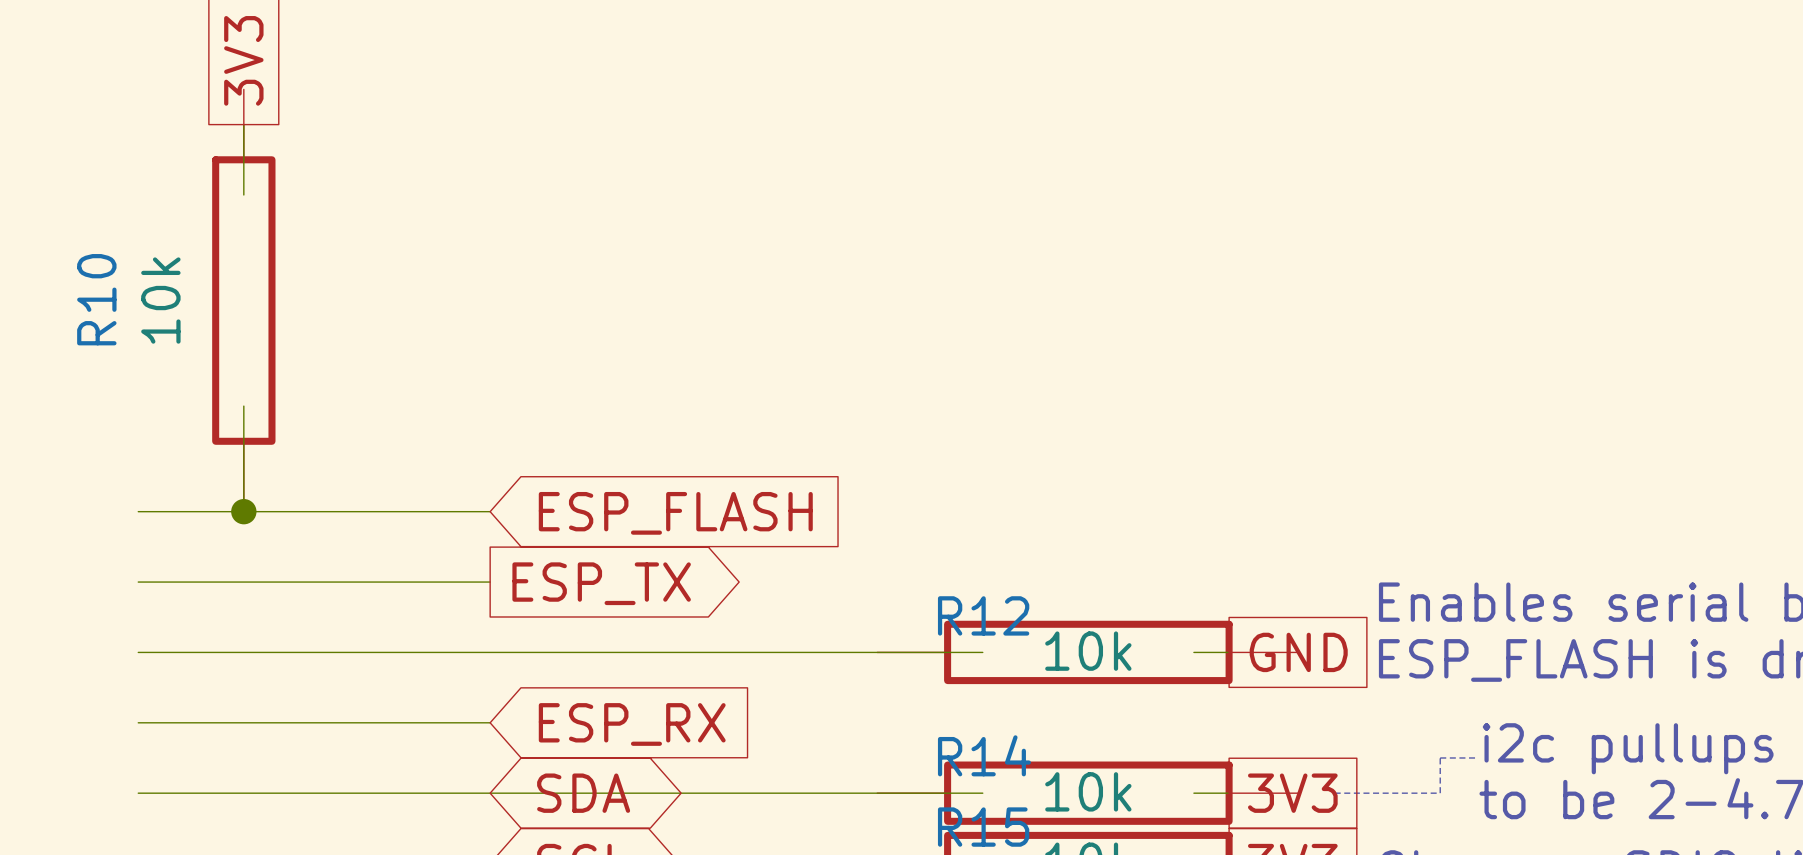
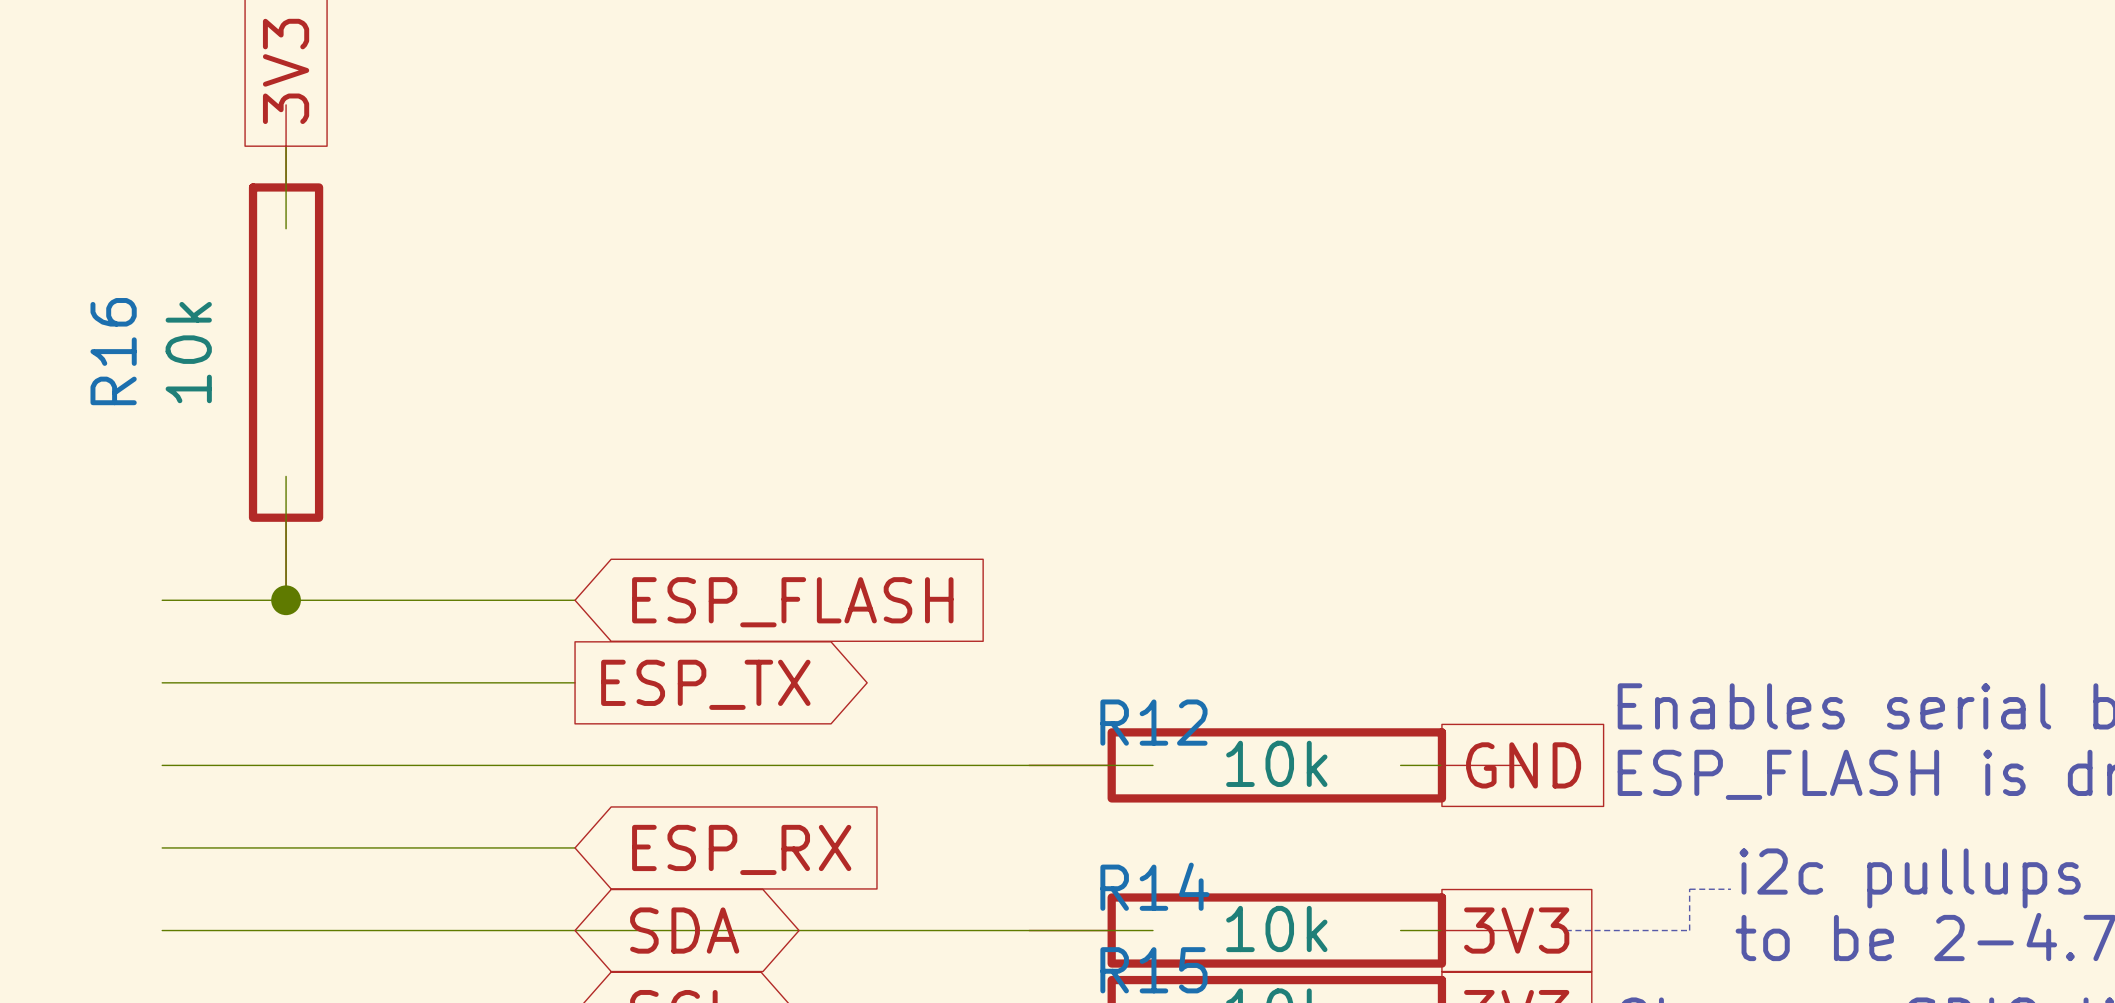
R10 name: R10 (96, 299) -> R16 (113, 351)

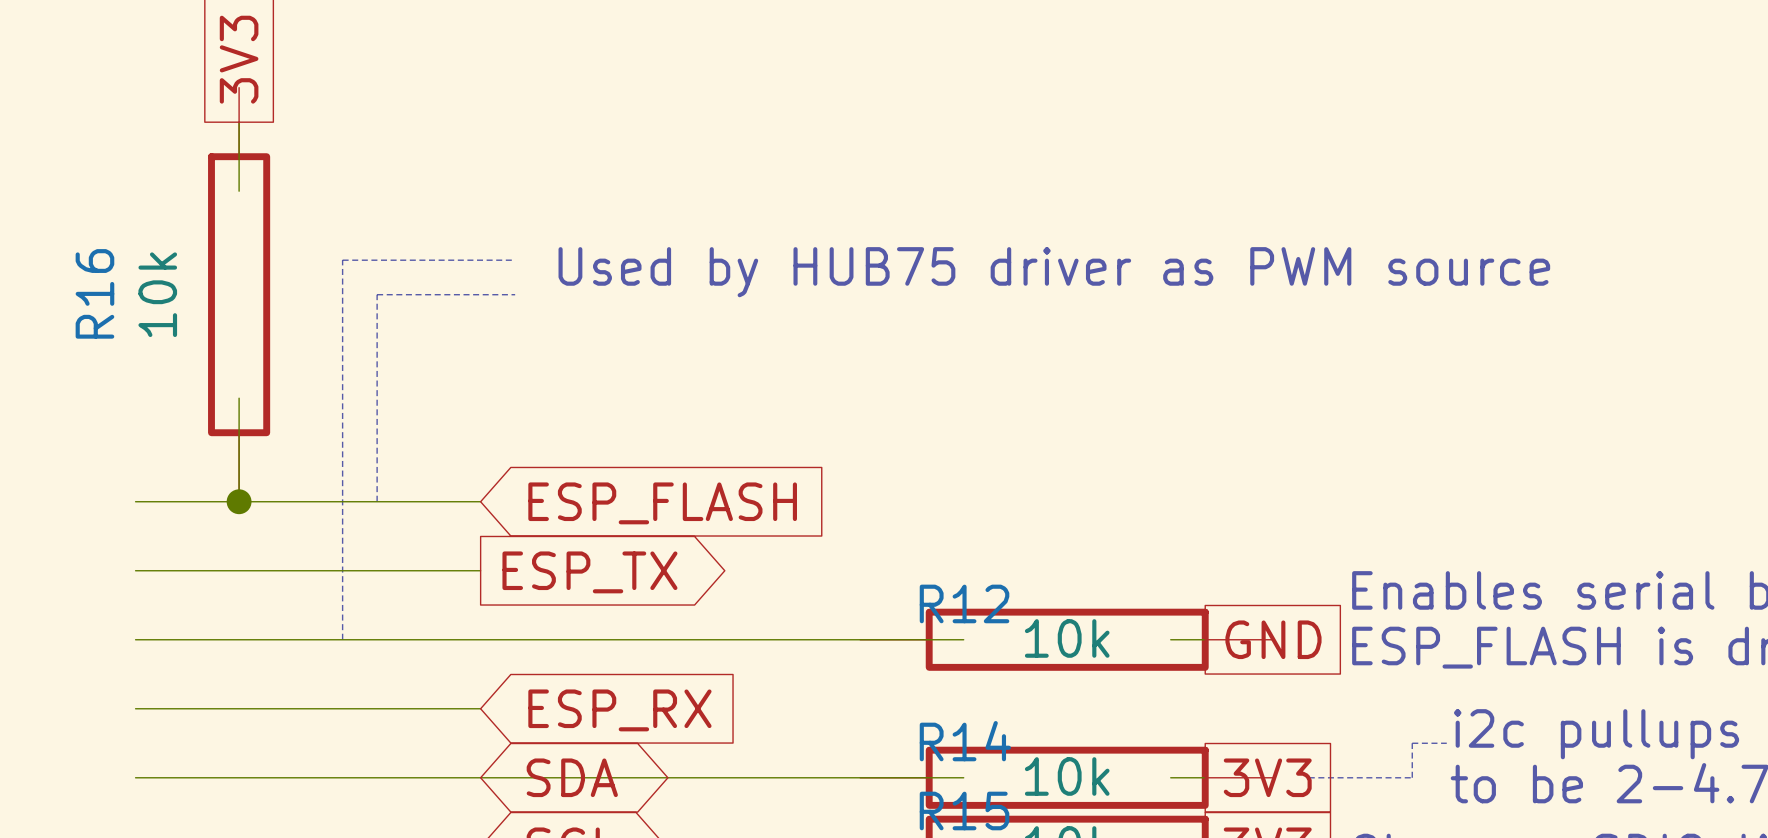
line: none -> (515, 260) (342, 260) (342, 639)
text: none -> Used by HUB75 driver as PWM source (1054, 272)
line: none -> (515, 294) (377, 294) (377, 501)

